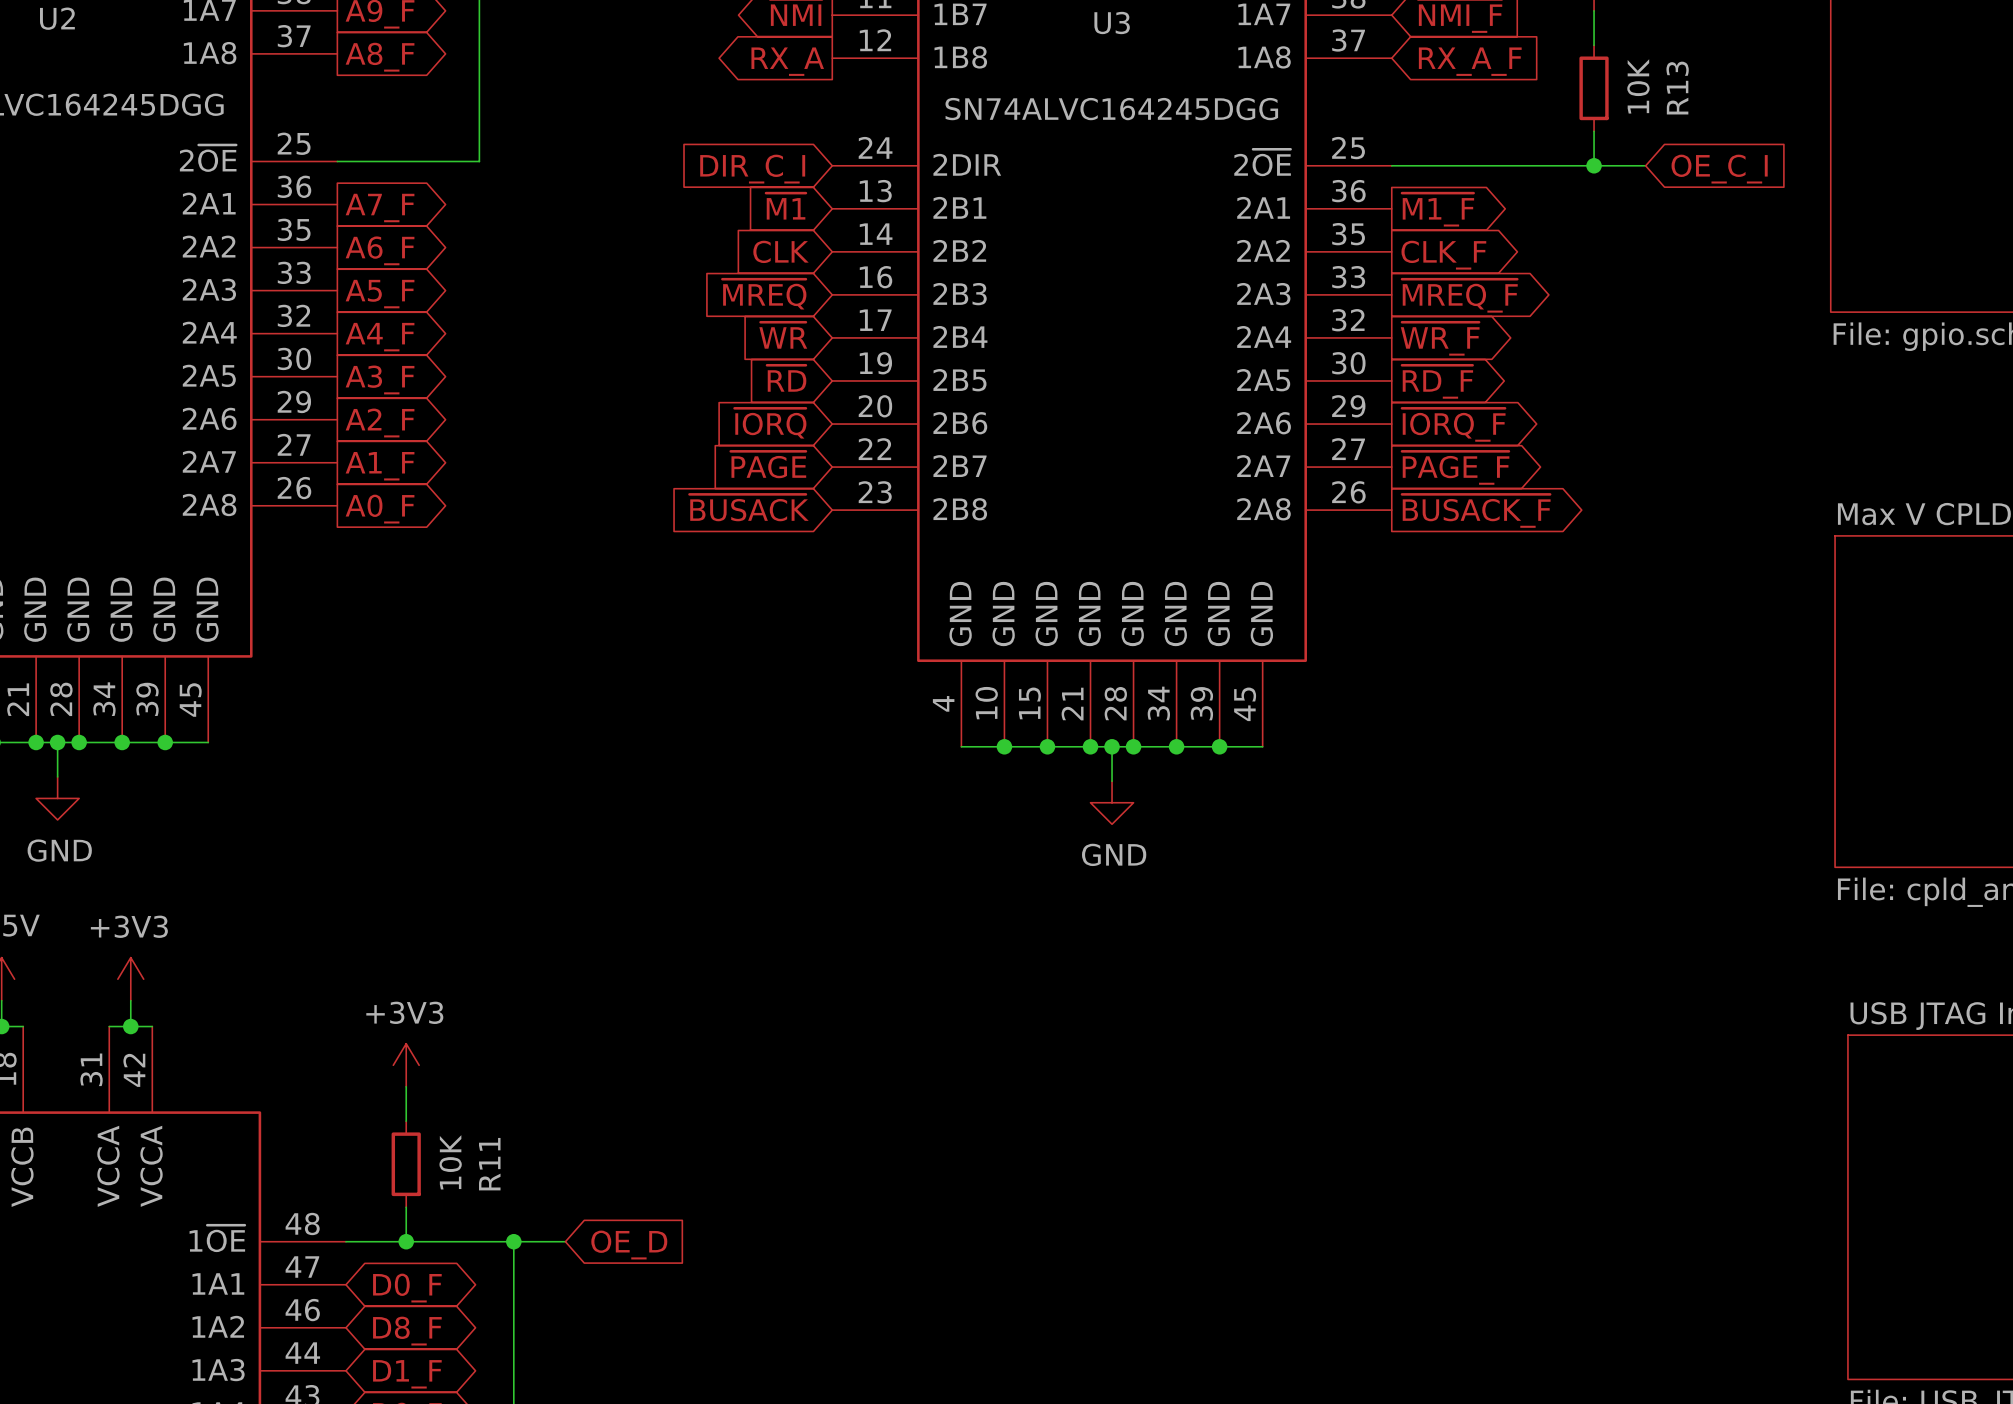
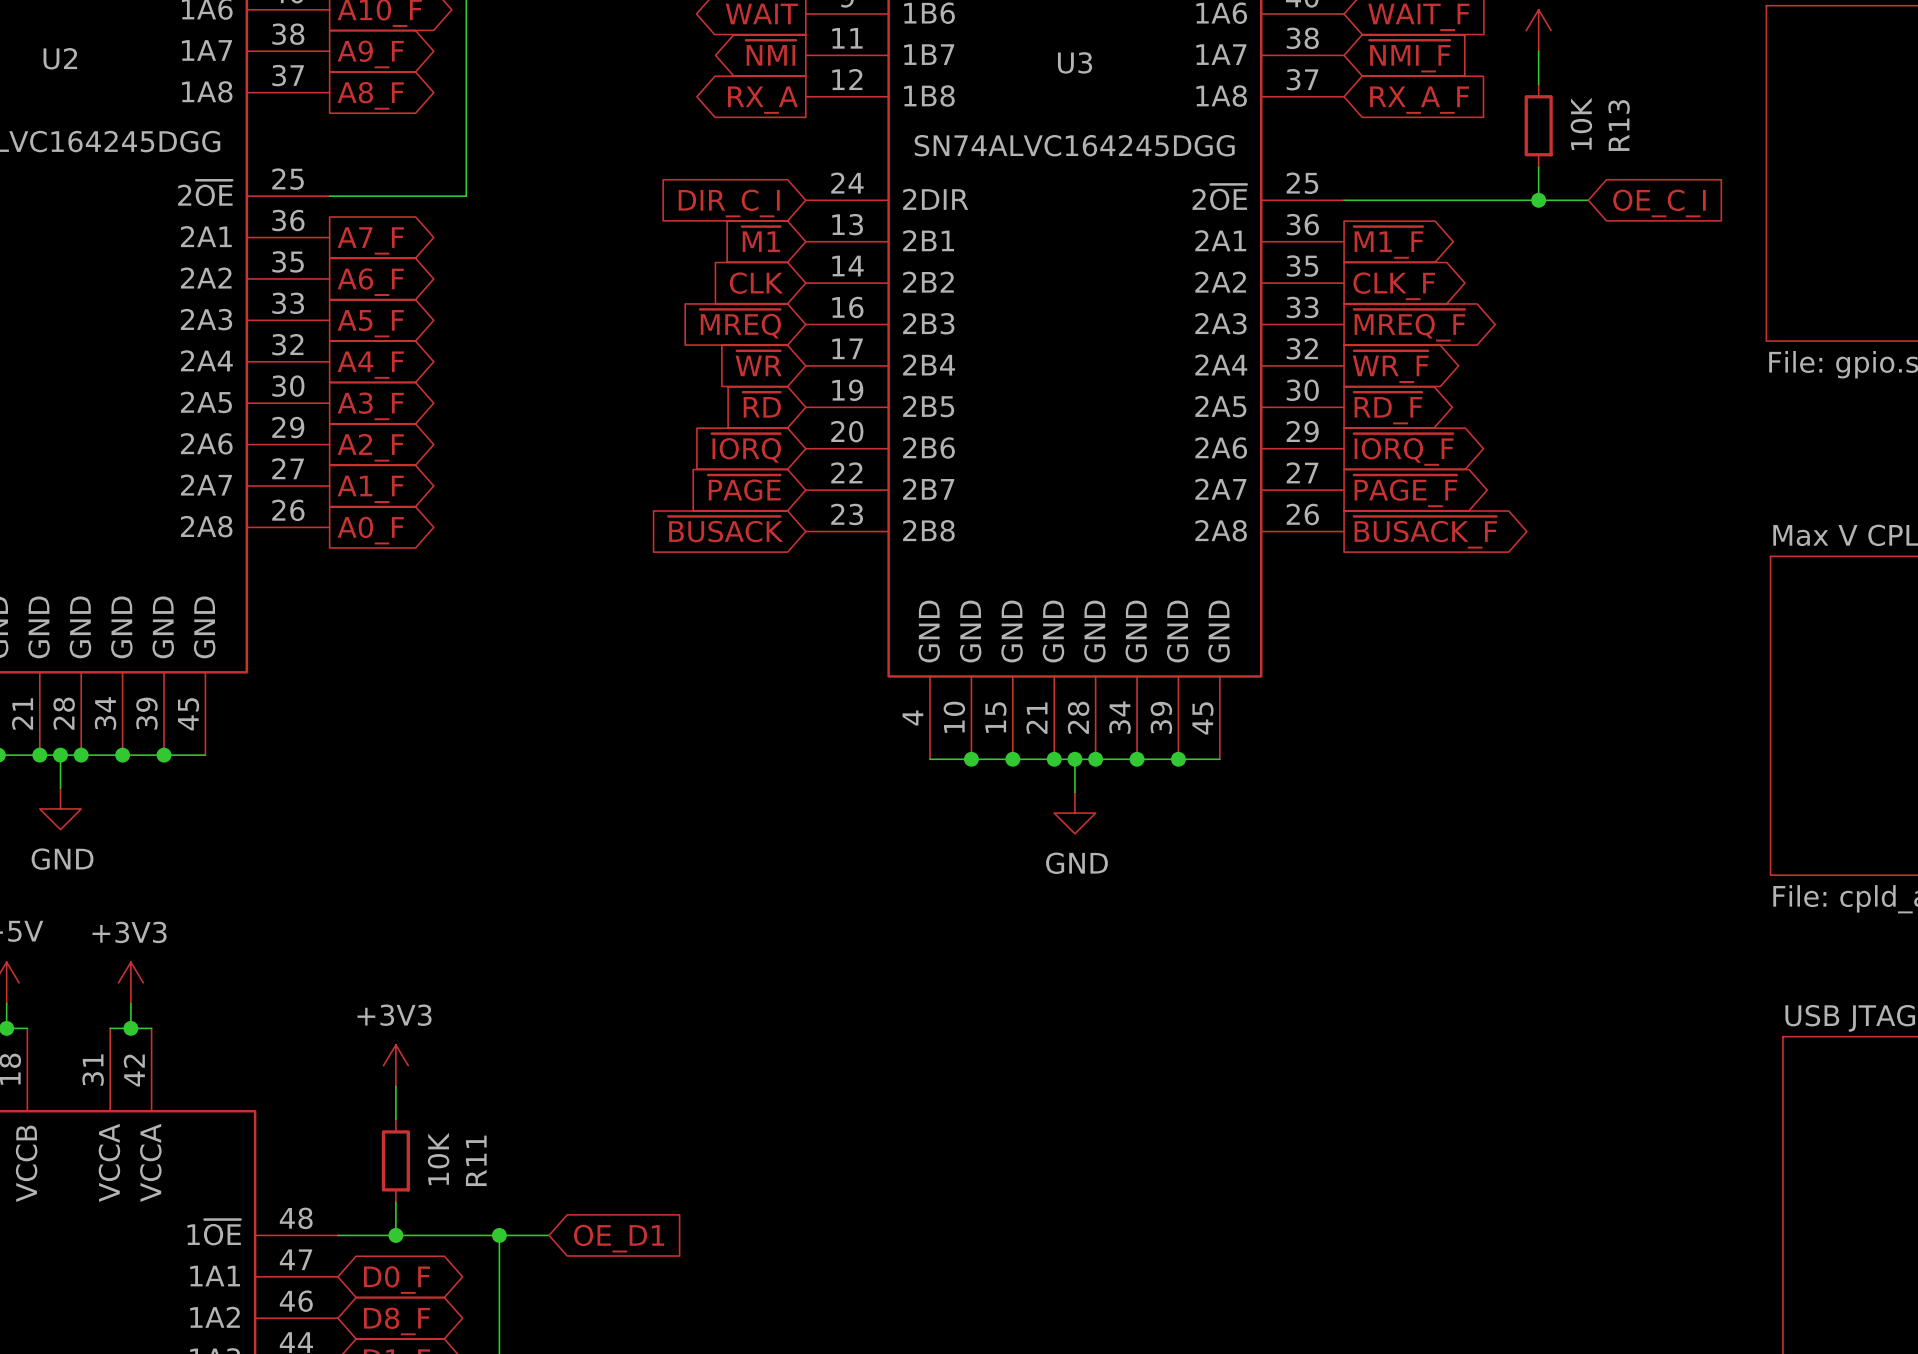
global label: OE_D (629, 1245) -> OE_D1 (619, 1238)

